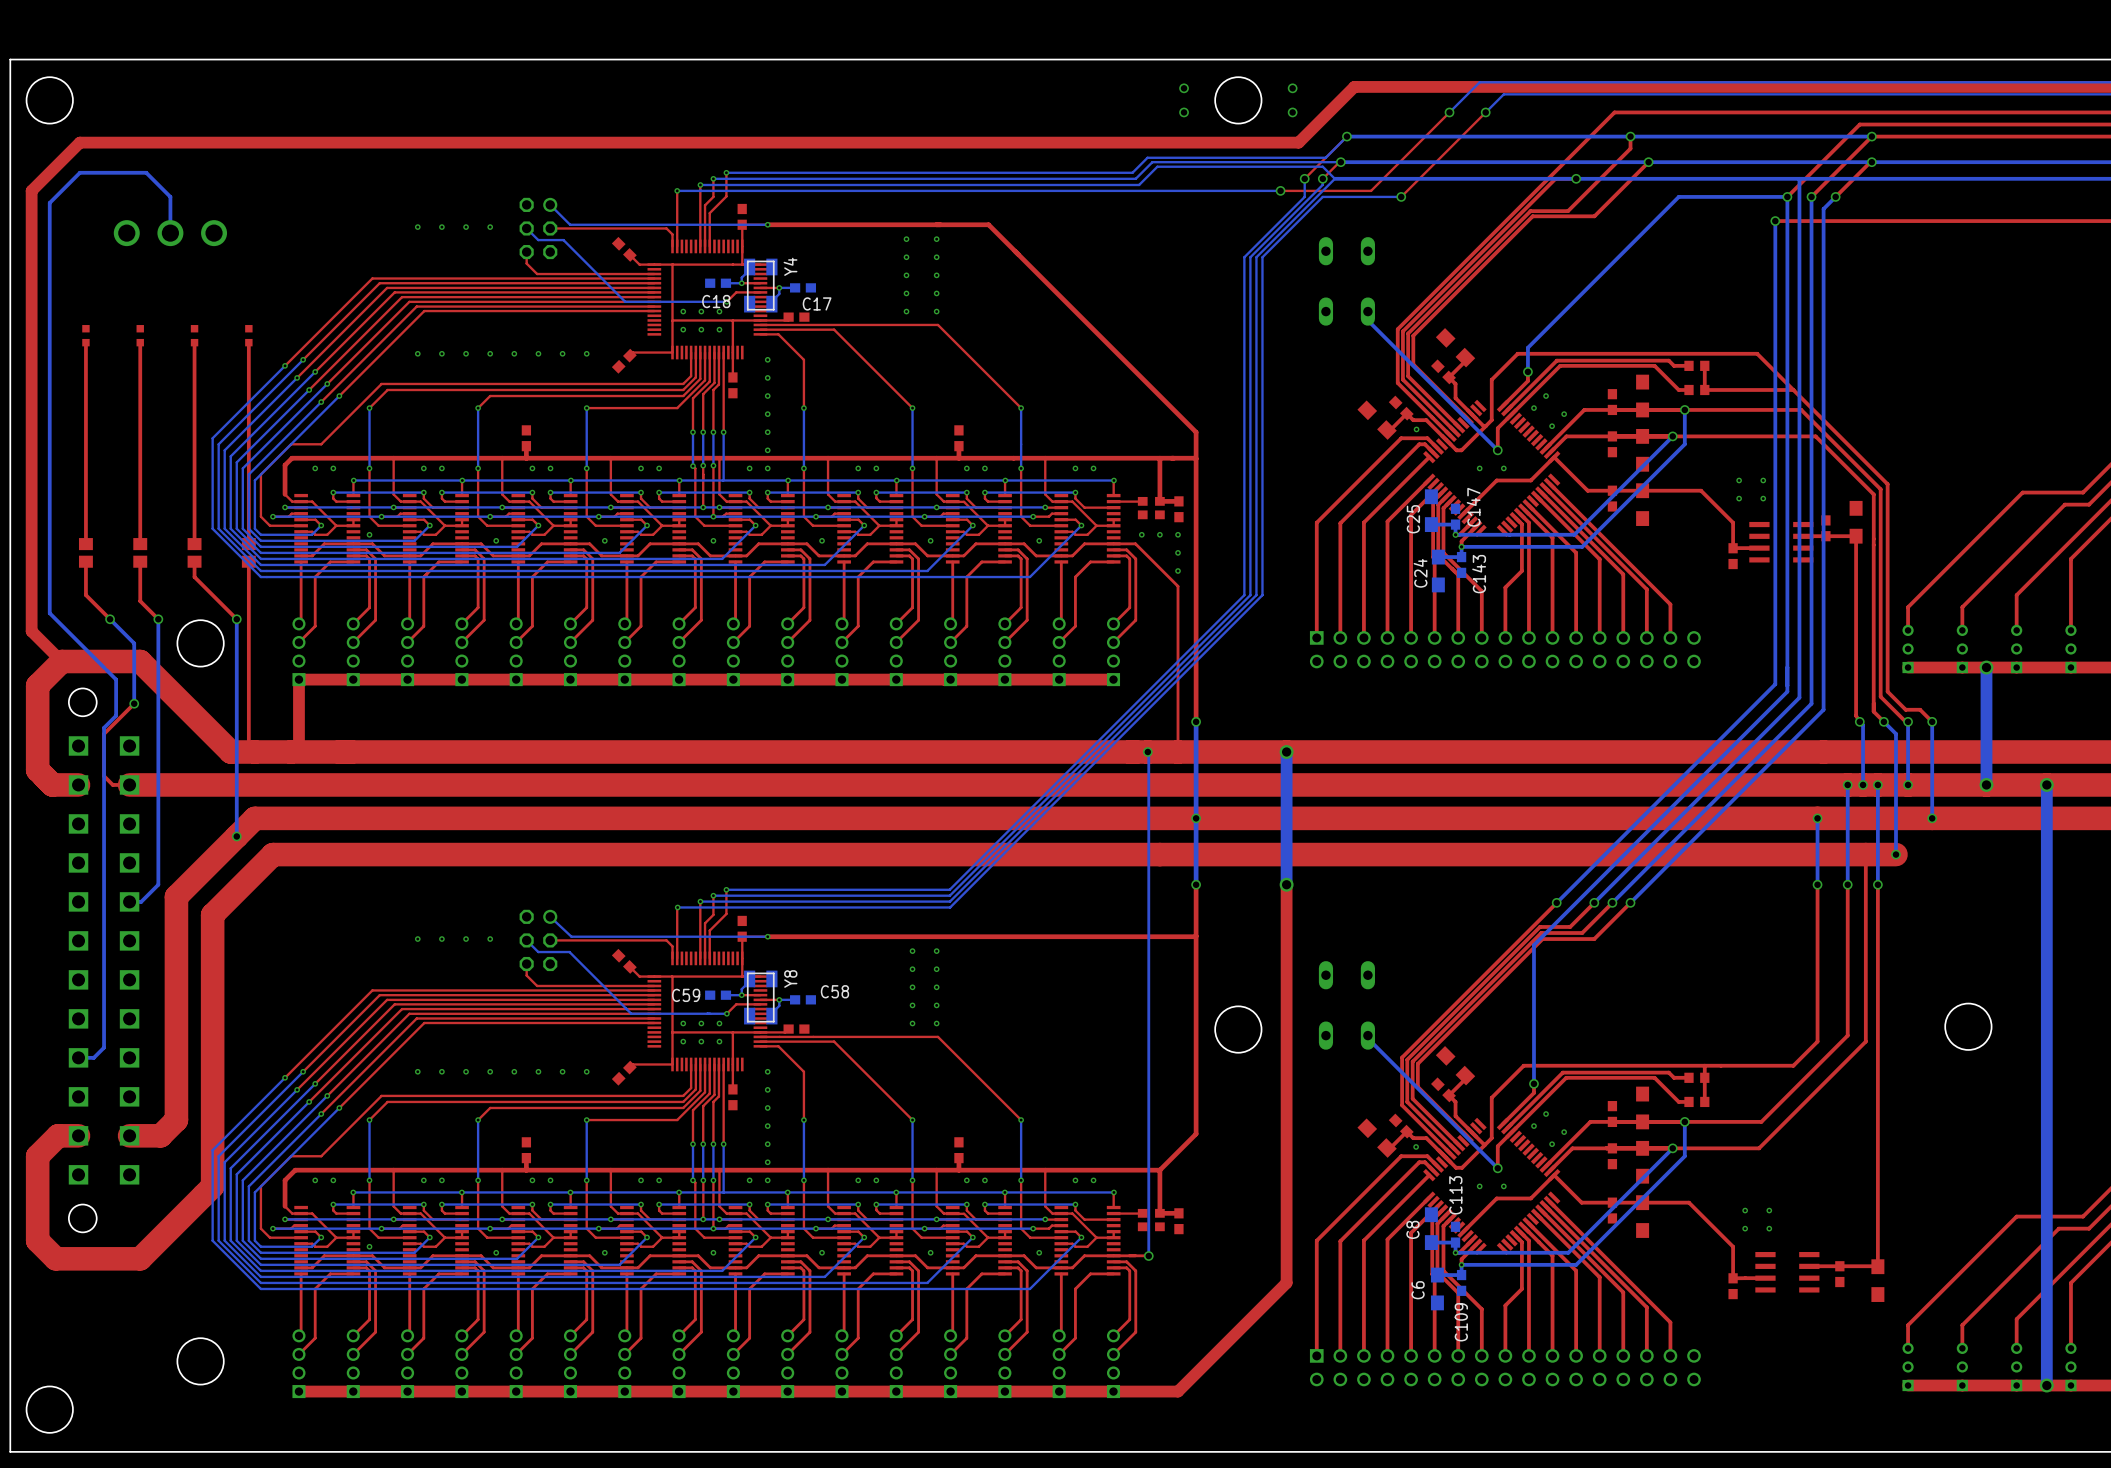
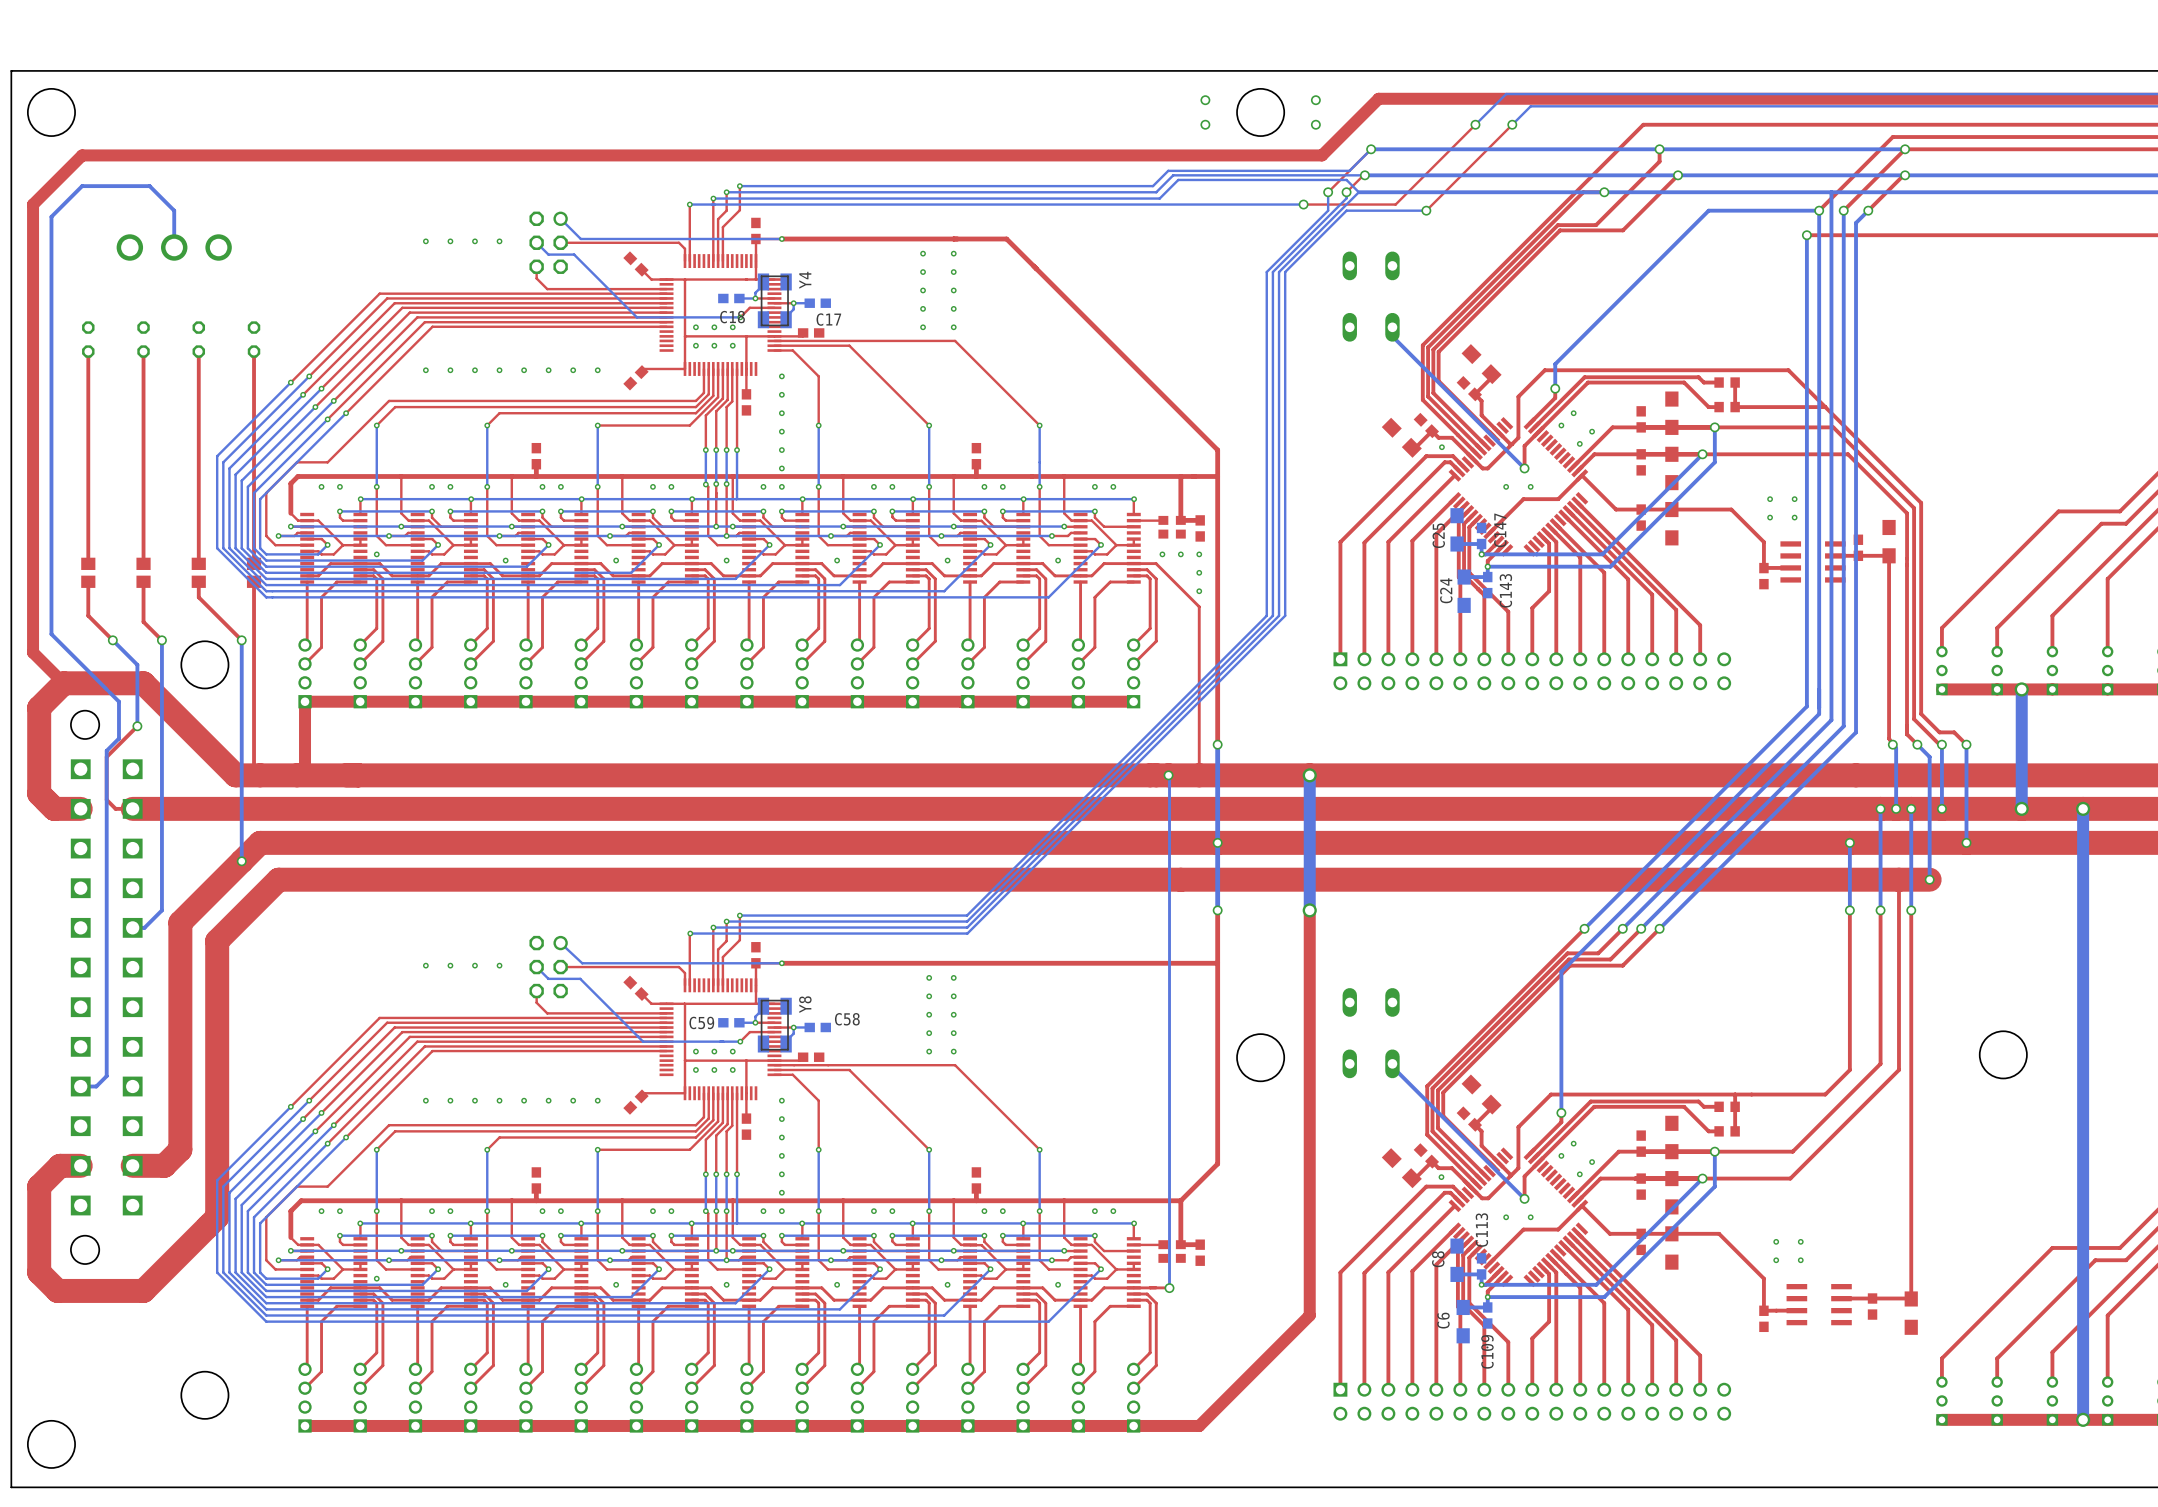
part: none -> (88, 339)
part: none -> (143, 339)
part: none -> (198, 339)
part: none -> (254, 339)
part: (85, 335) -> none
part: (140, 335) -> none
part: (194, 335) -> none
part: (248, 335) -> none

